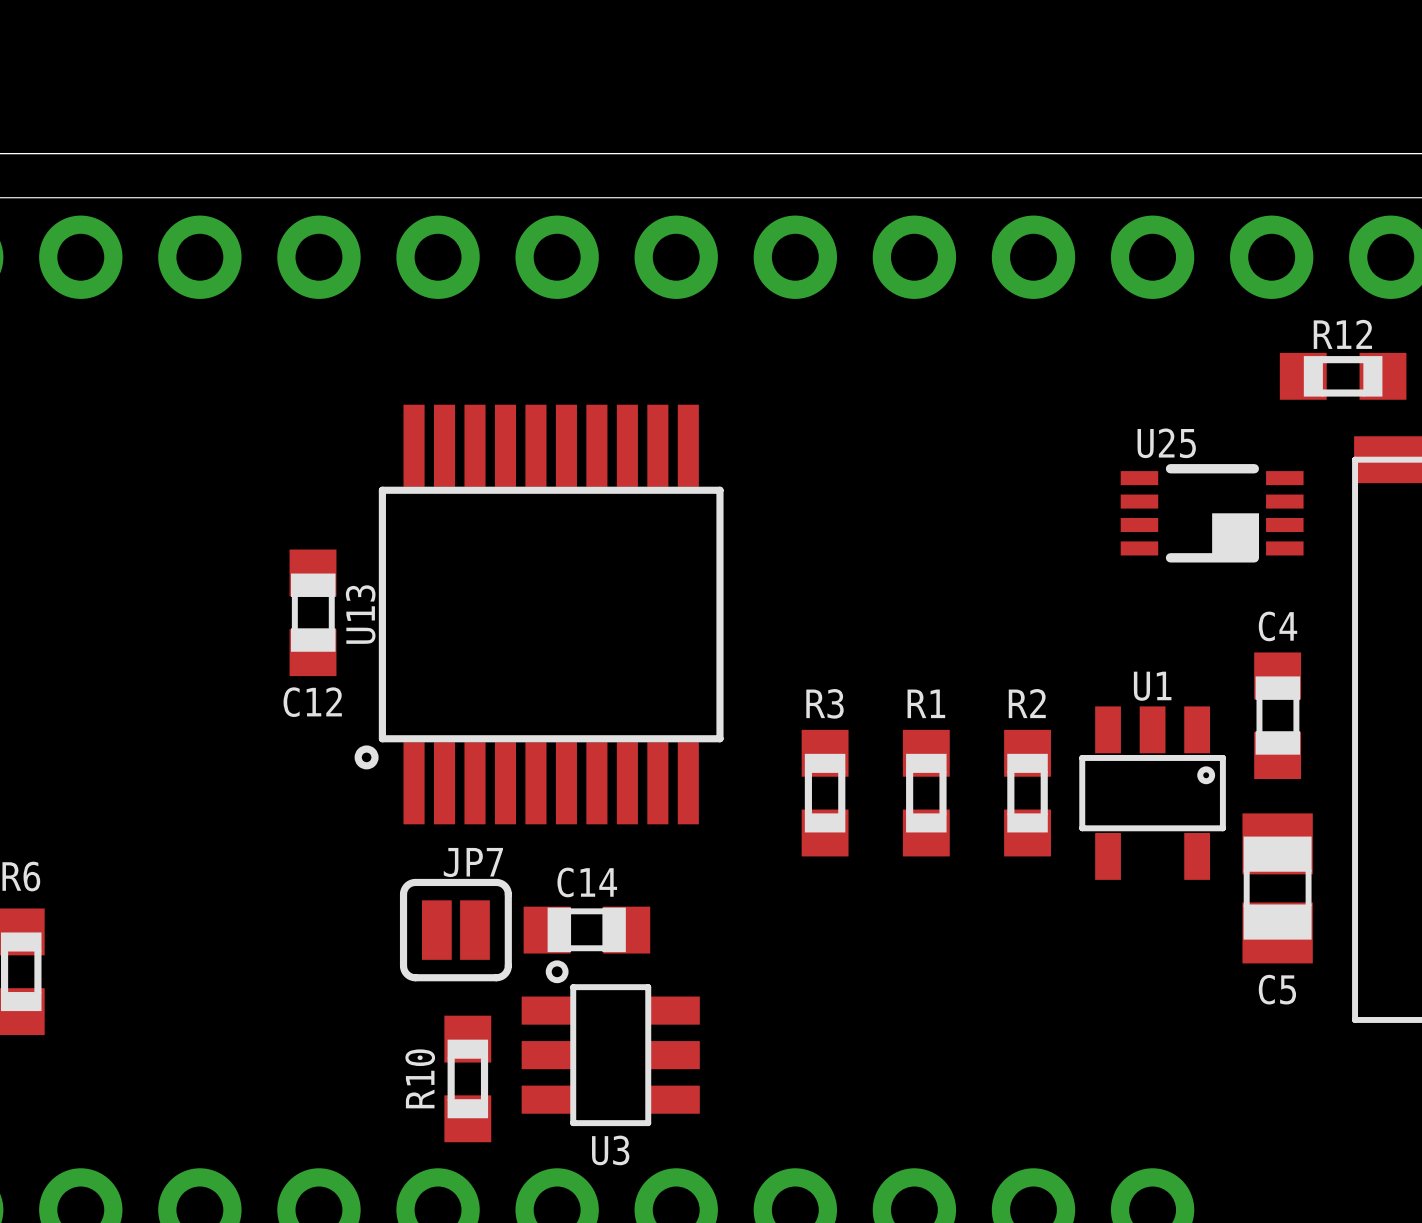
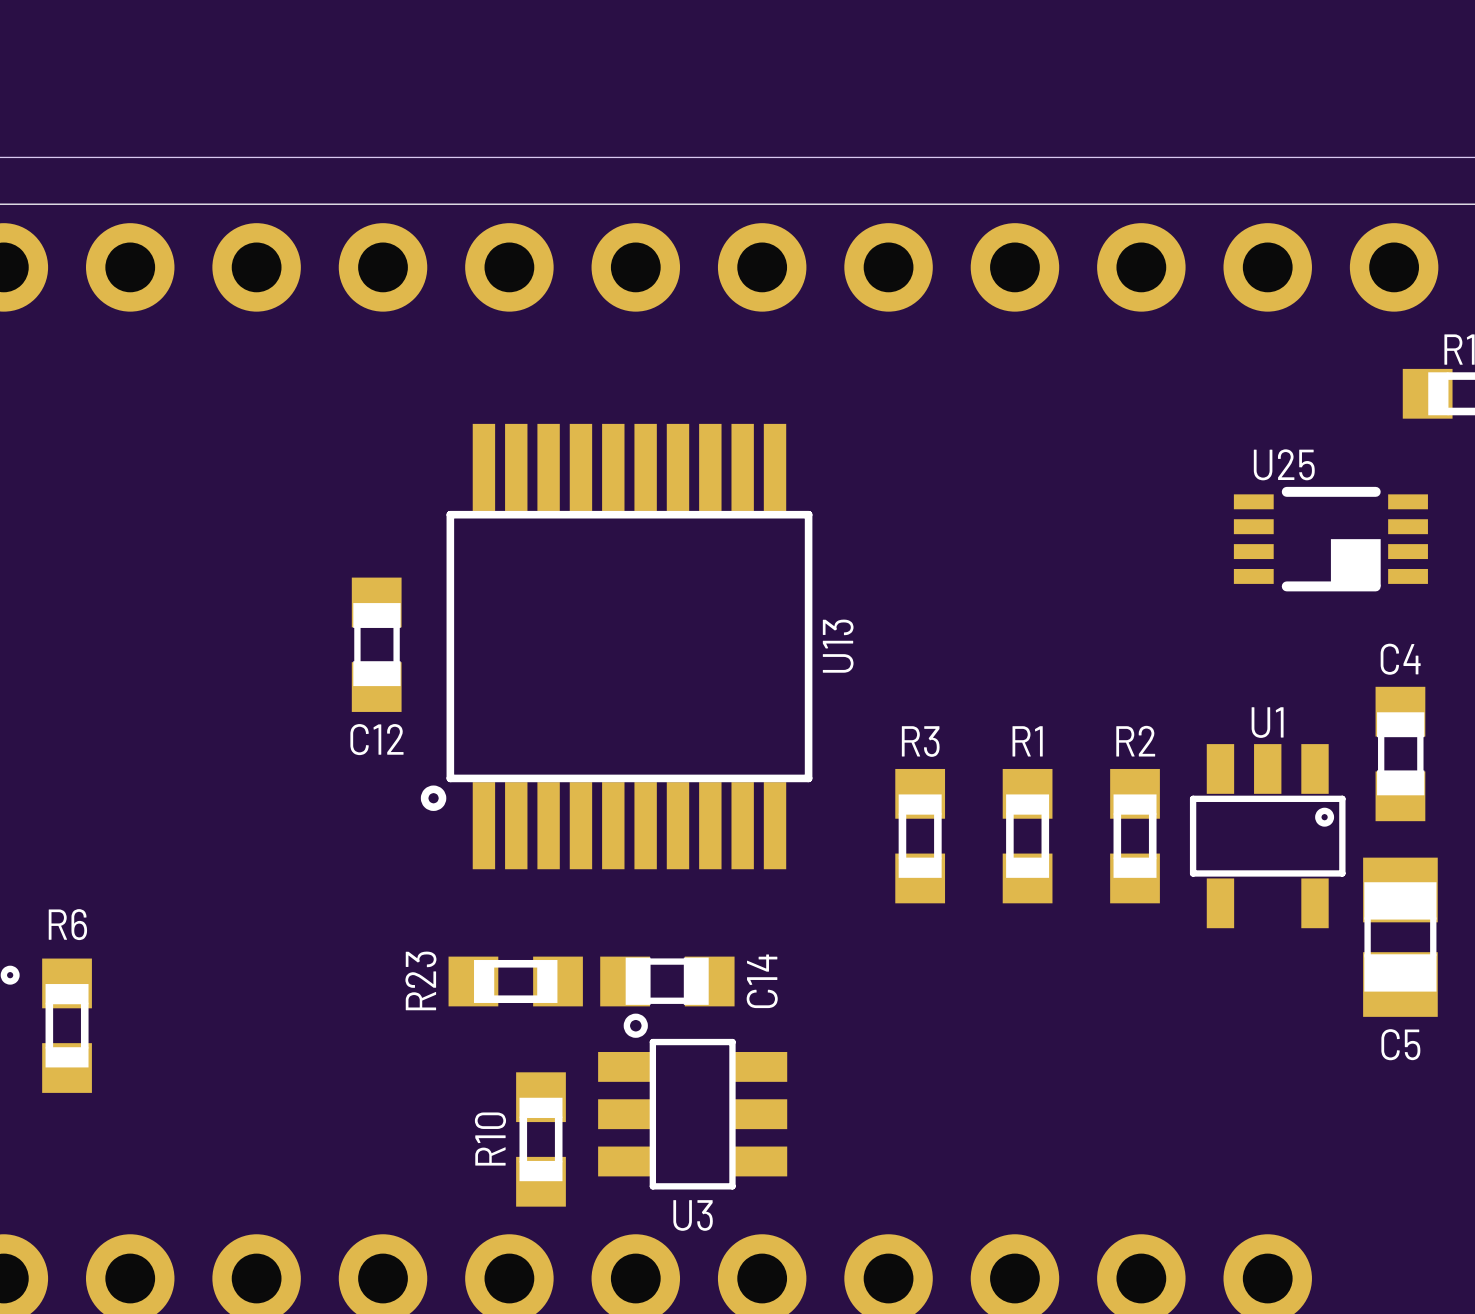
U13 name position: U13 (360, 614) -> U13 (838, 646)
C14 name rotation: 0° (587, 882) -> 90° counterclockwise (762, 981)
C14 name position: C14 (587, 882) -> C14 (762, 981)
R23: none -> (515, 981)
JP7: (455, 930) -> none

